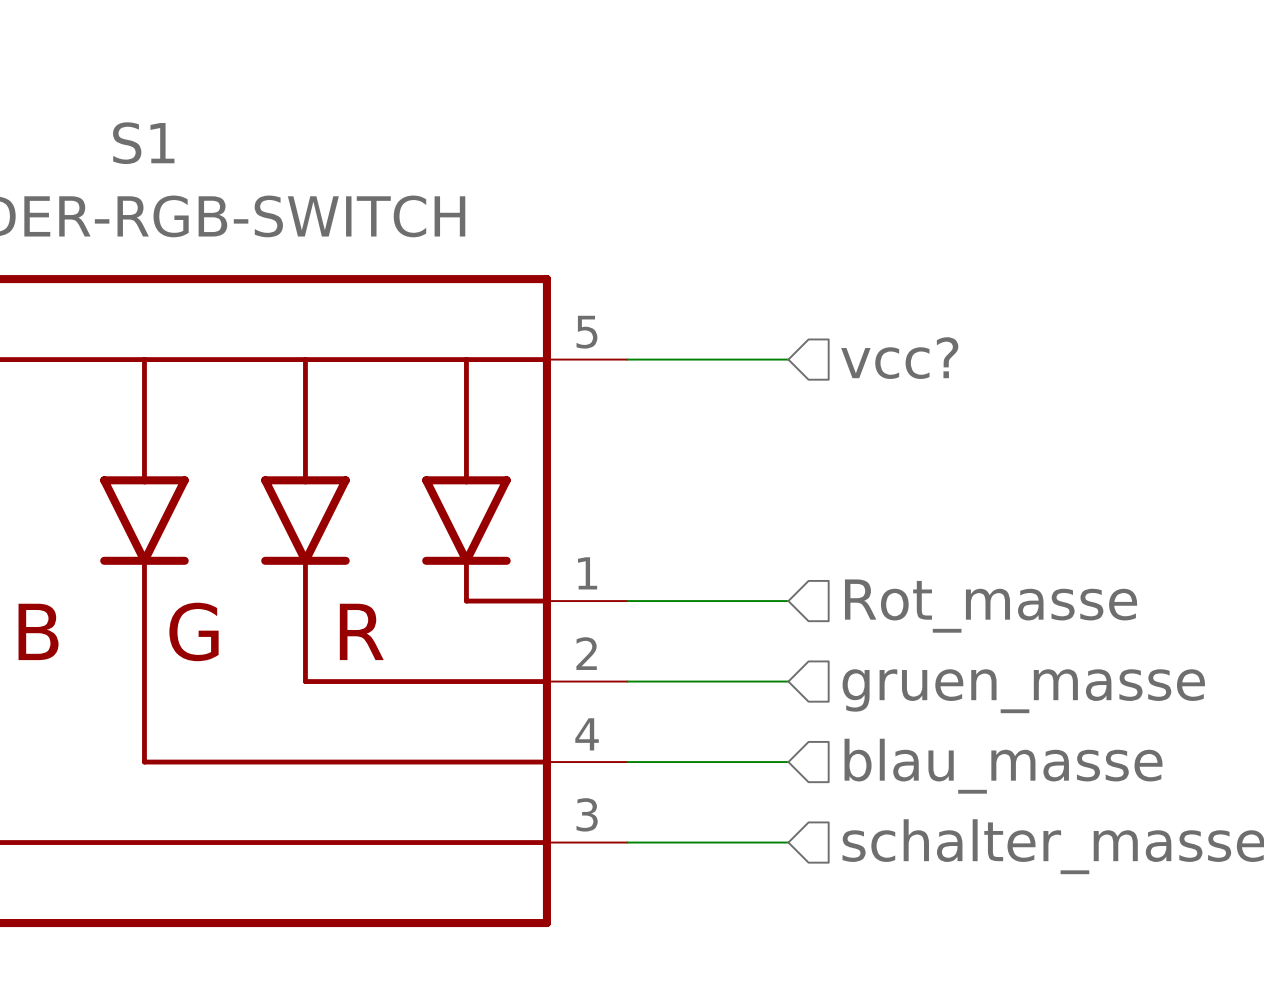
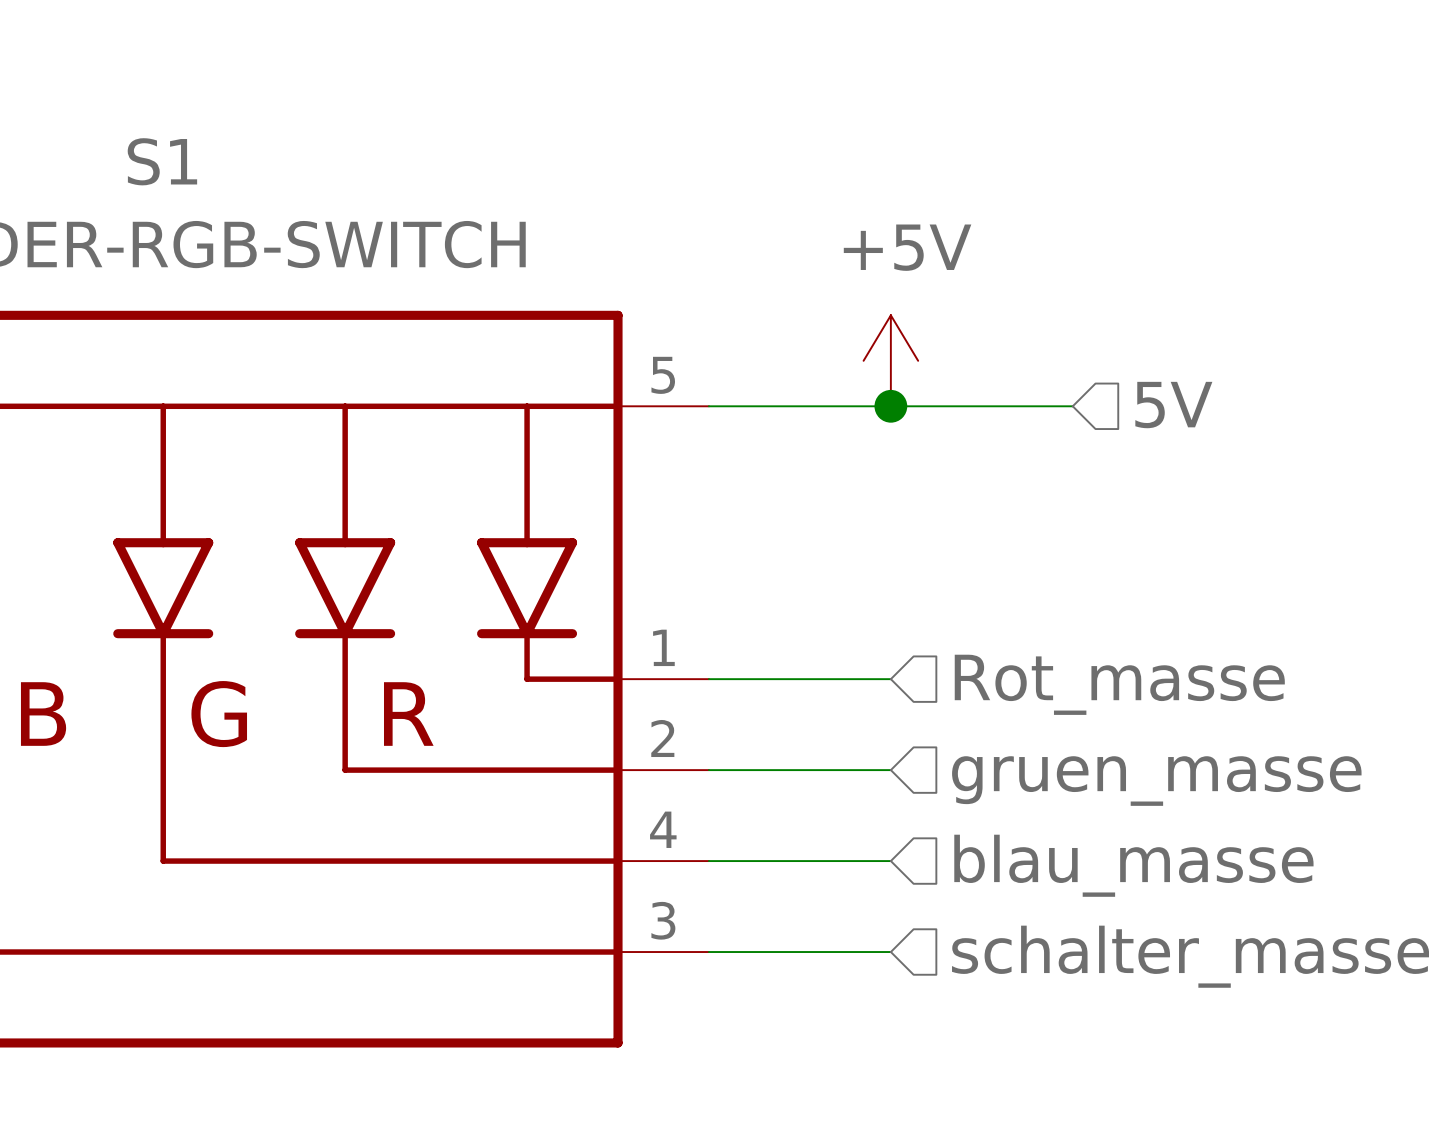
power symbol: none -> +5V (890, 360)
hierarchical label: vcc? (899, 358) -> none
hierarchical label: none -> 5V (1173, 405)
wire: none -> (890, 406) (1072, 406)
junction: none -> (890, 406)

